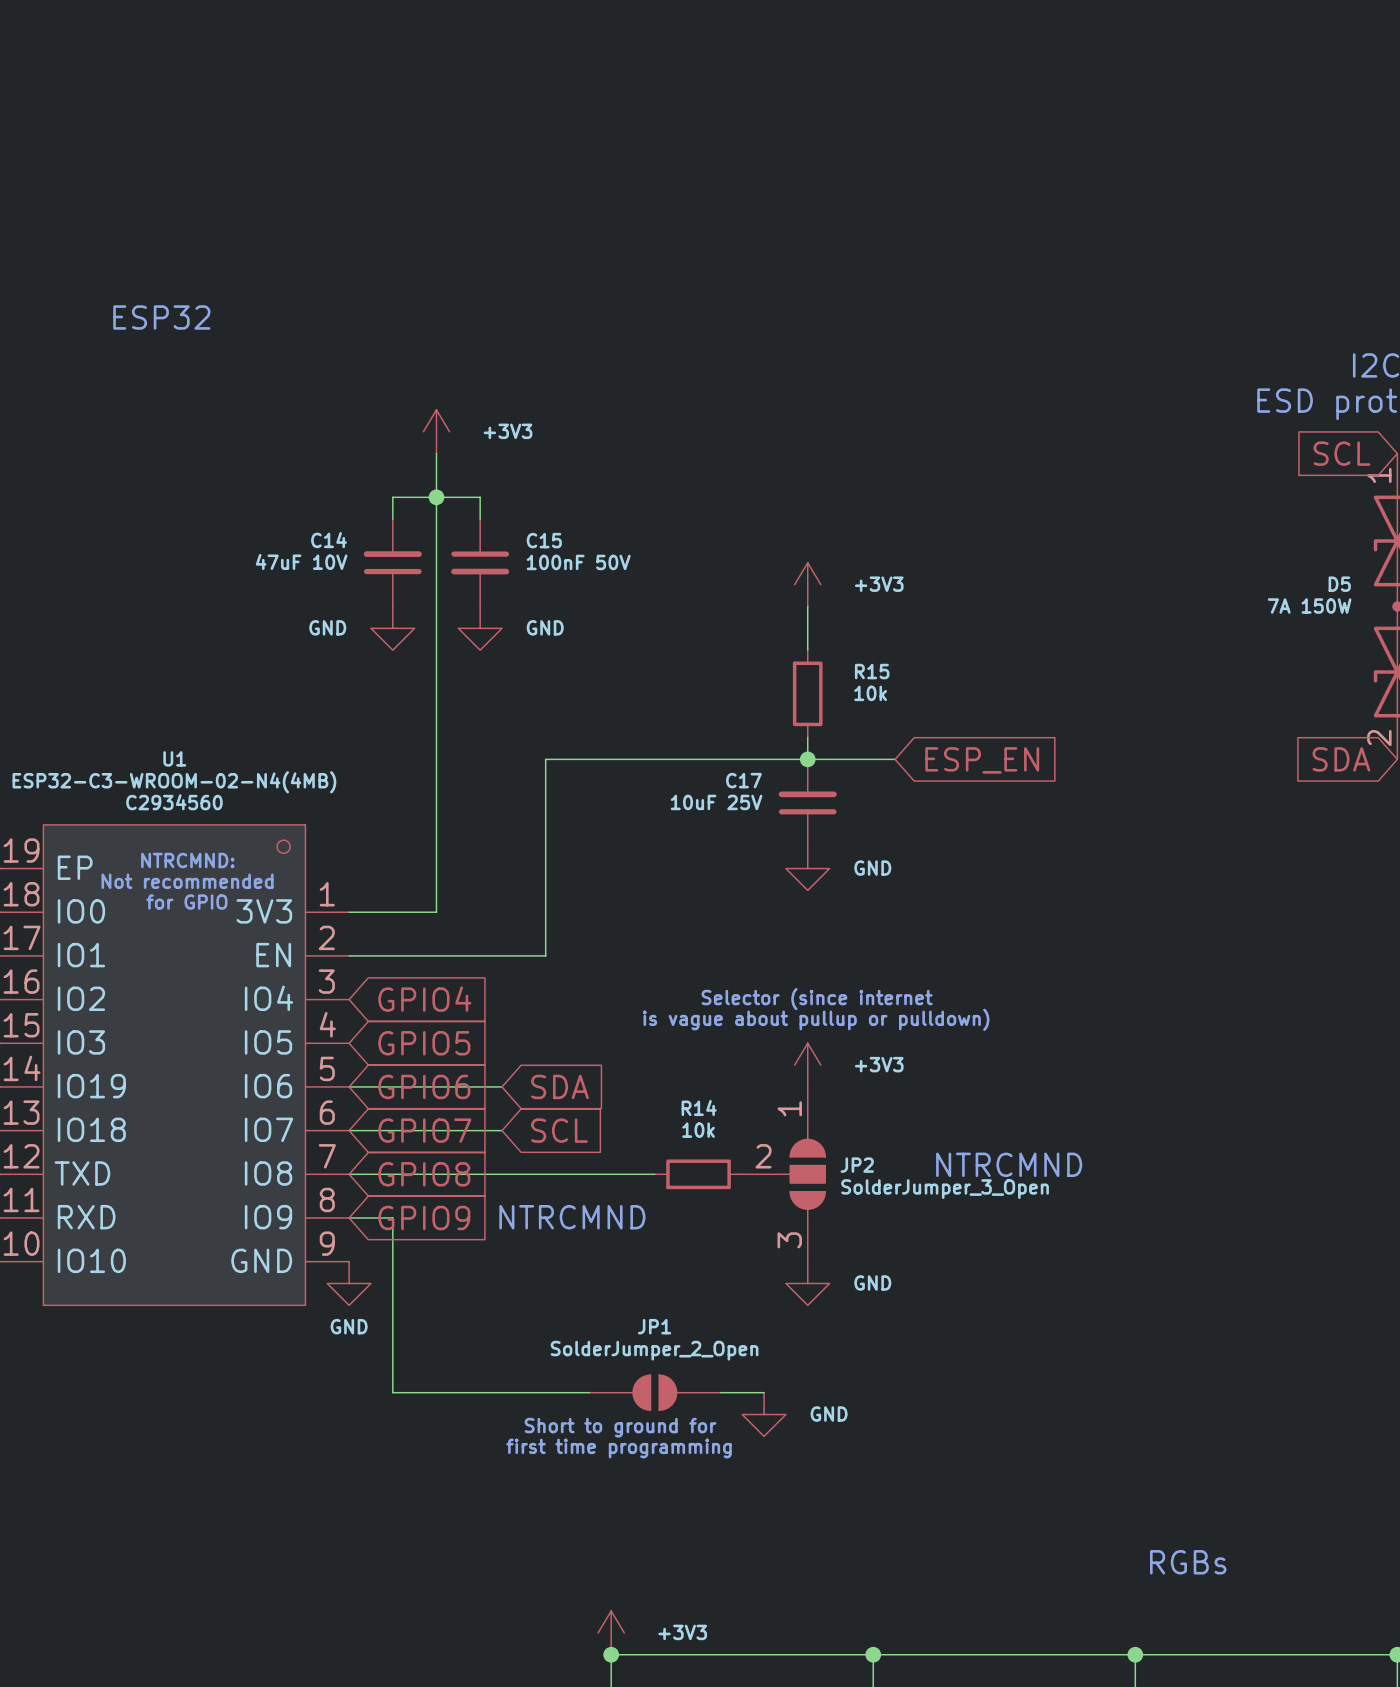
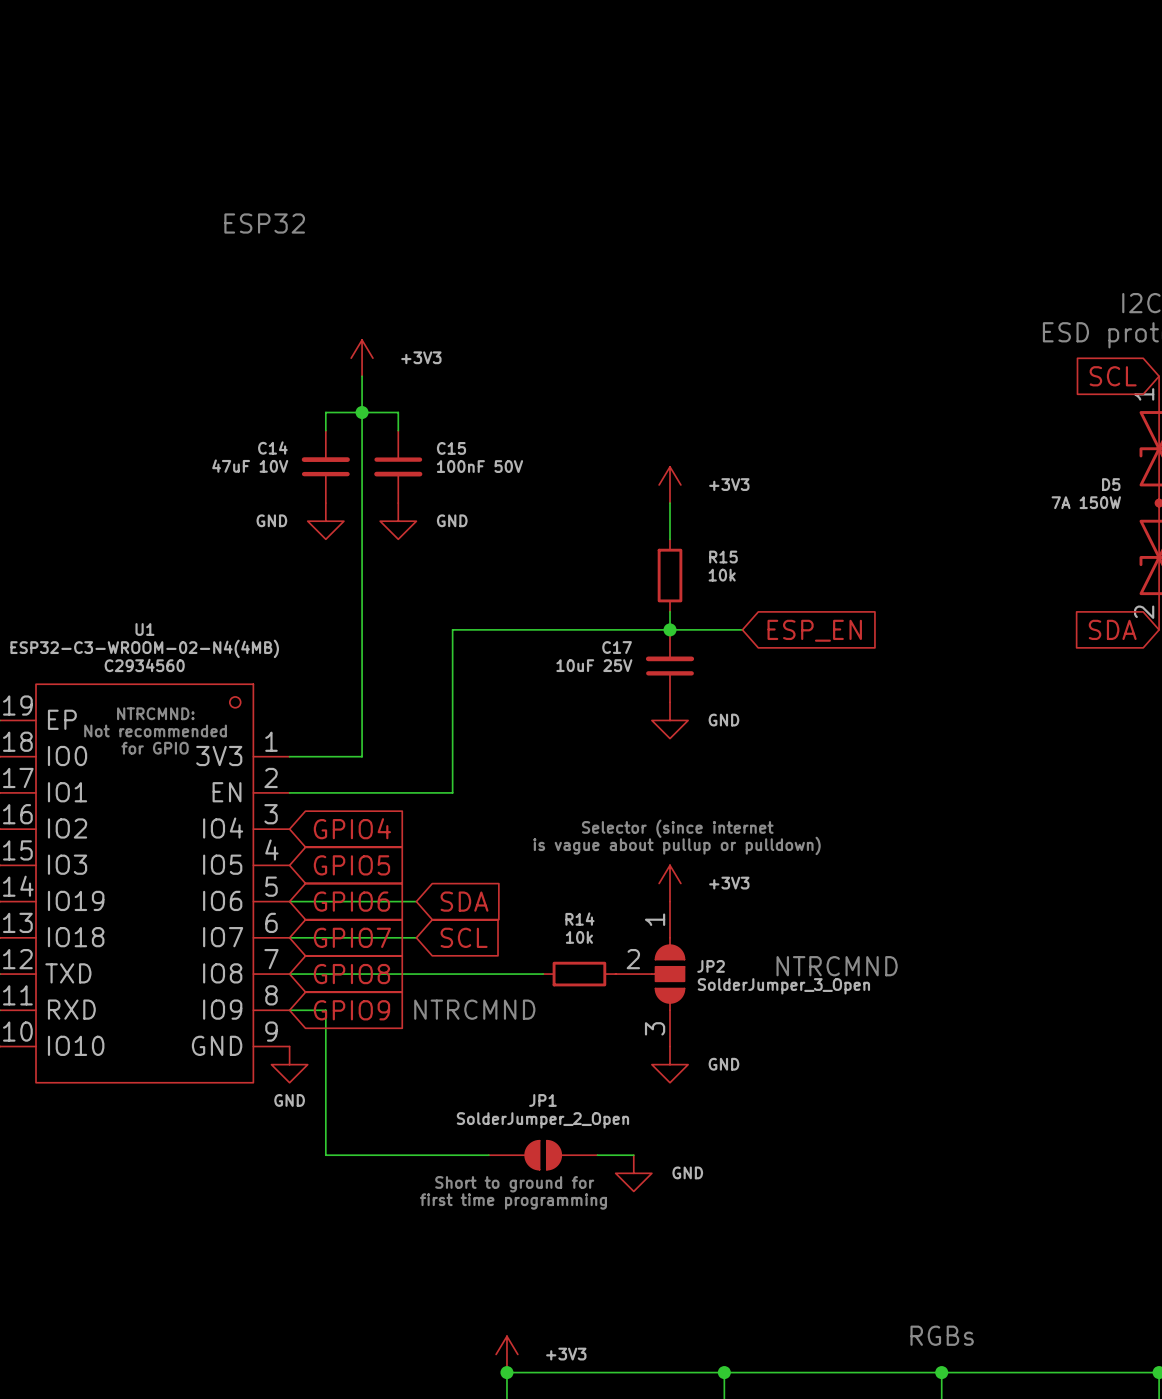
text position: ESP32 (161, 317) -> ESP32 (264, 223)
text position: RGBs (1188, 1562) -> RGBs (942, 1335)

